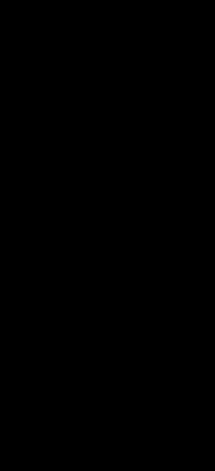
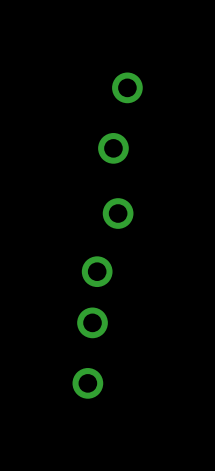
part: none -> (127, 87)
part: none -> (113, 148)
part: none -> (118, 213)
part: none -> (97, 271)
part: none -> (92, 322)
part: none -> (87, 383)

